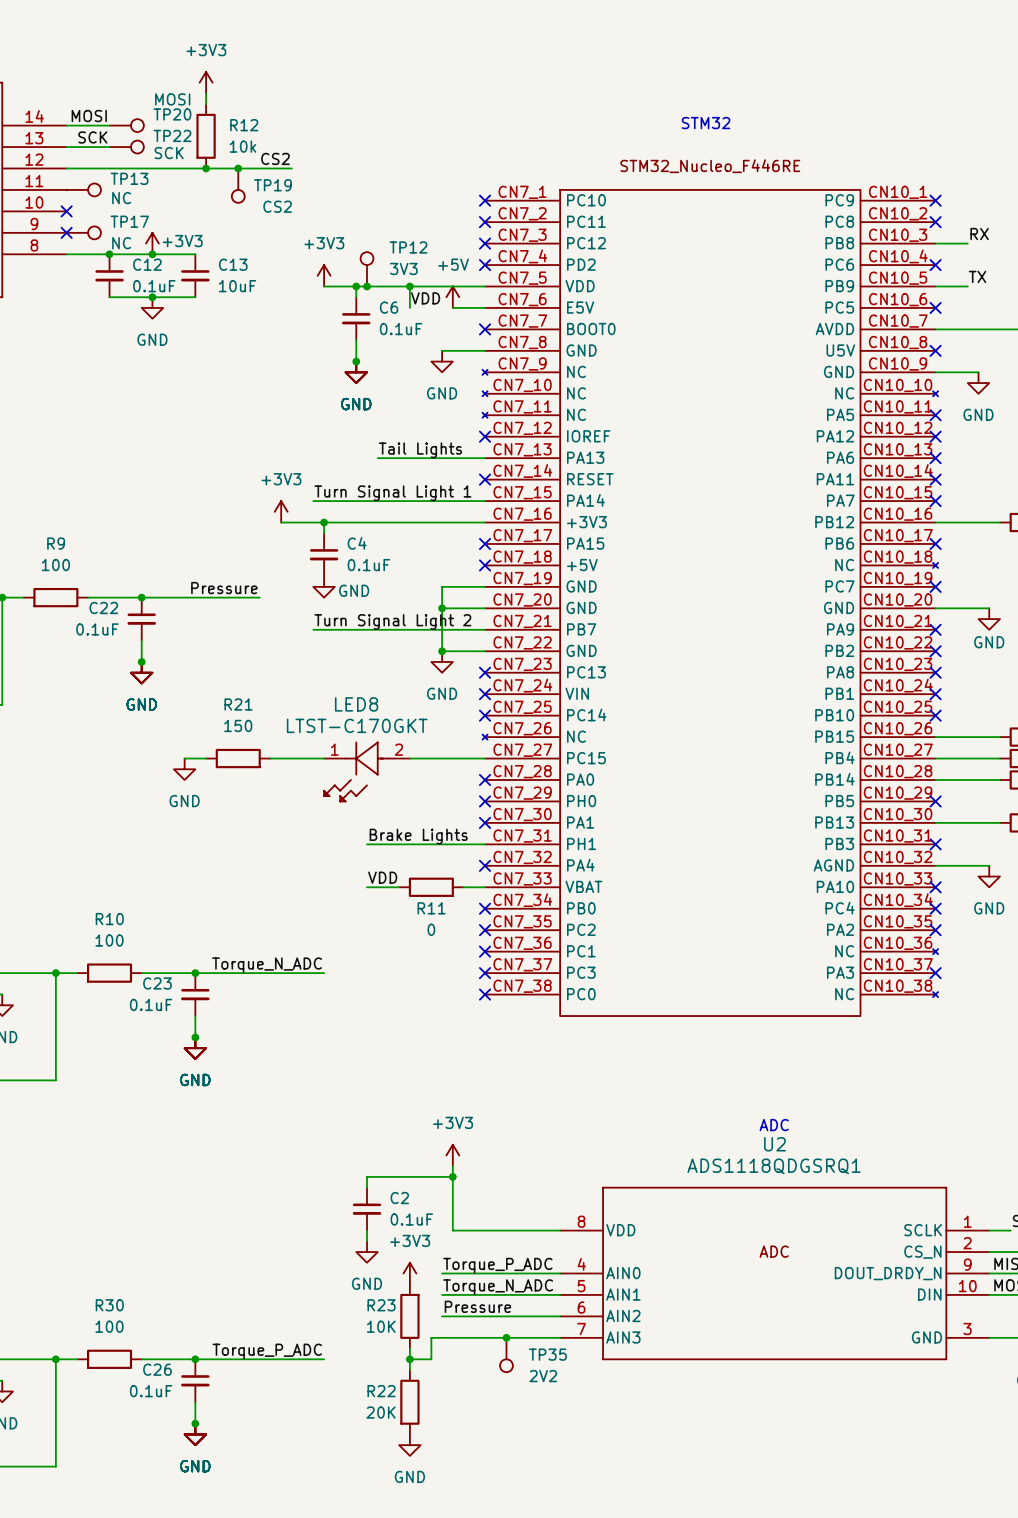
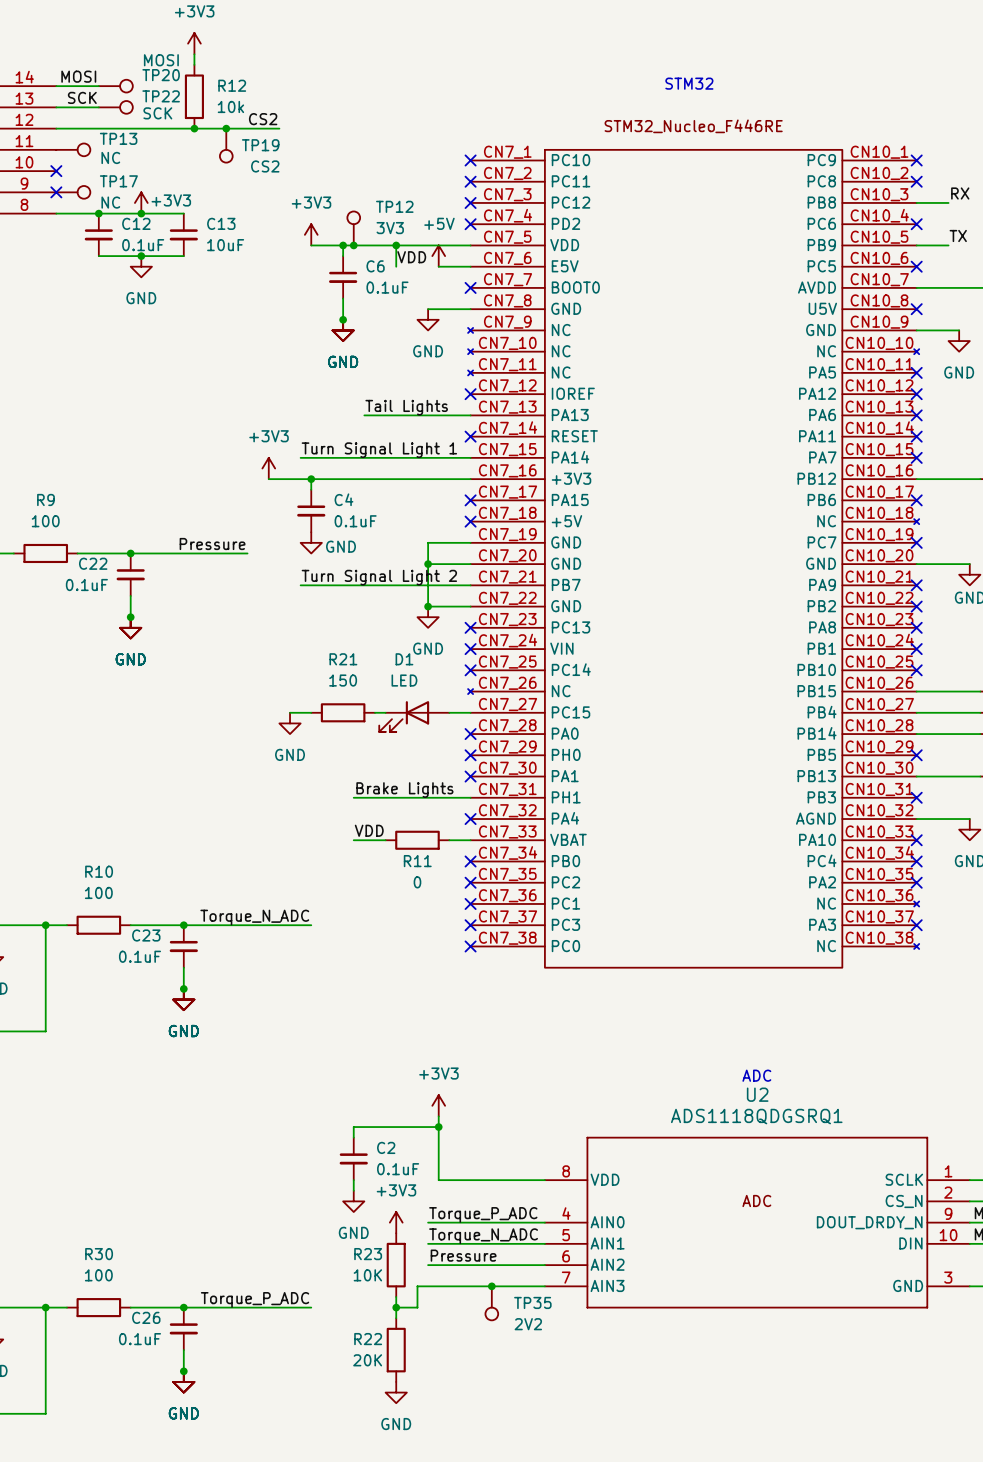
wire: (184, 758) (206, 758) -> none
R21 position: (238, 758) -> (343, 712)
wire: (270, 758) (302, 758) -> none
D1: none -> LED (414, 716)
power symbol position: GND (184, 769) -> GND (290, 723)
LED8: LTST-C170GKT (366, 771) -> none

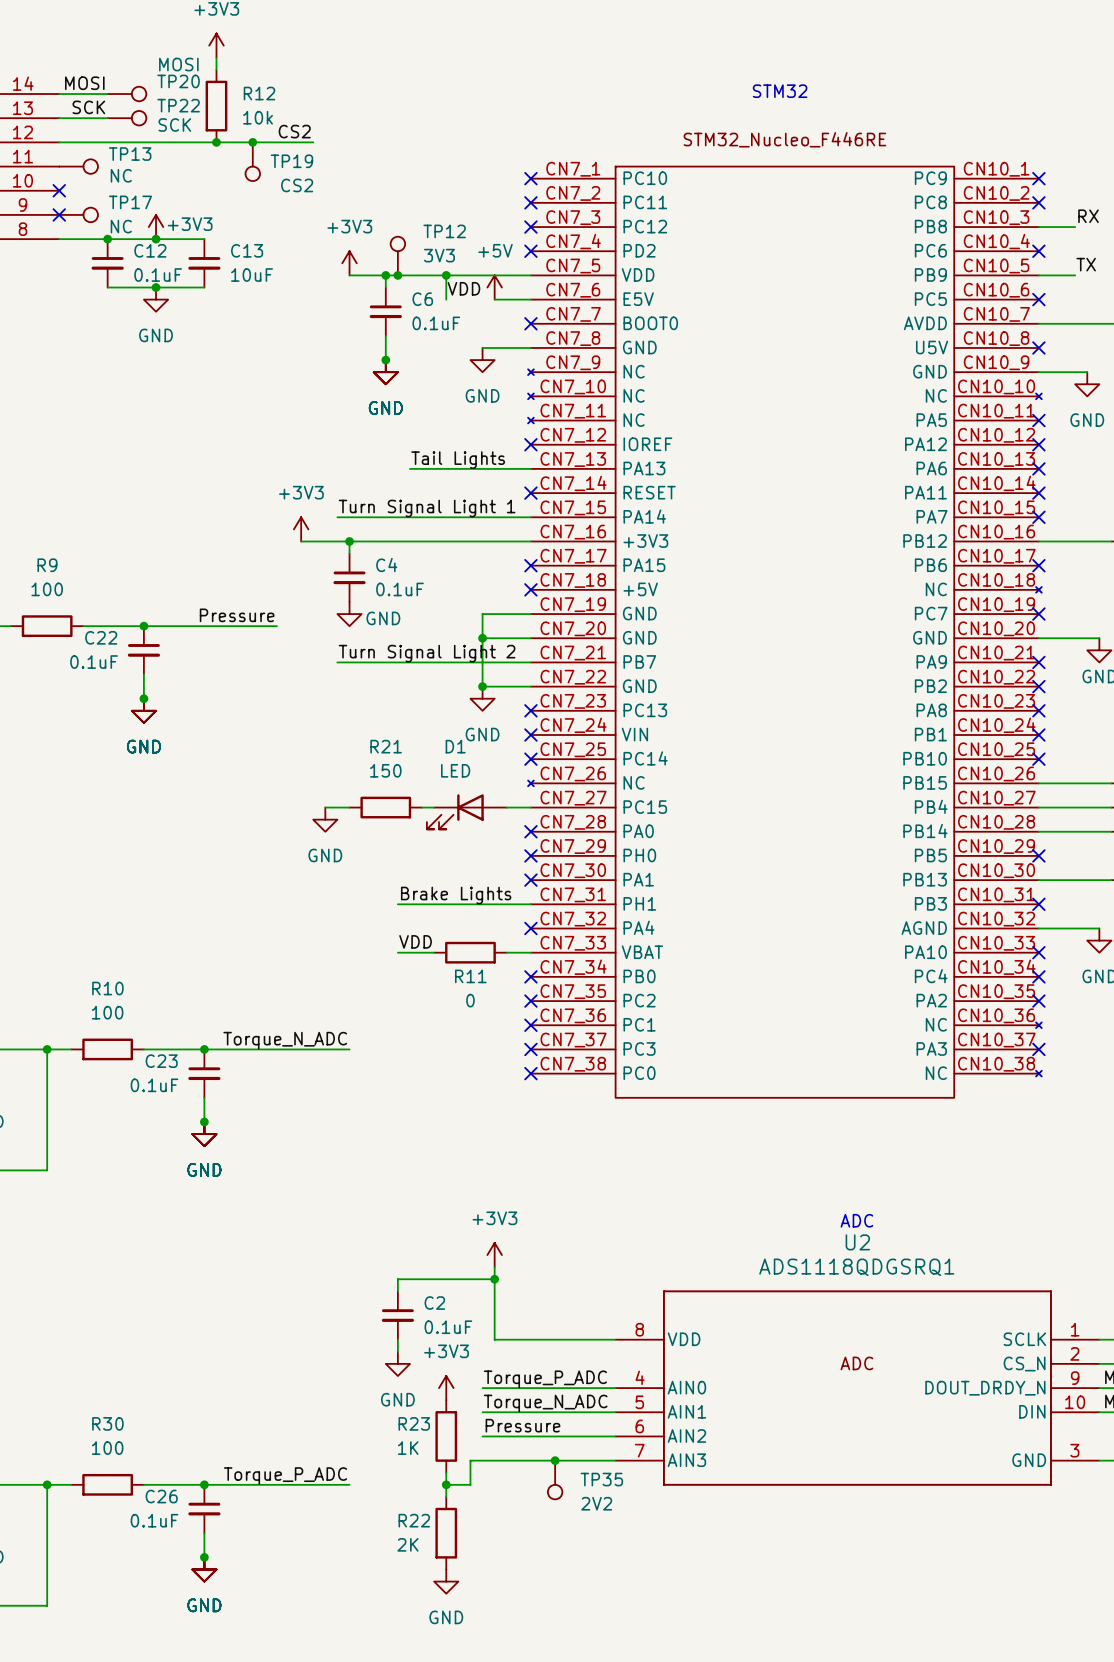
R23 value: 10K (367, 1275) -> 1K (408, 1448)
R22 value: 20K (367, 1360) -> 2K (407, 1544)

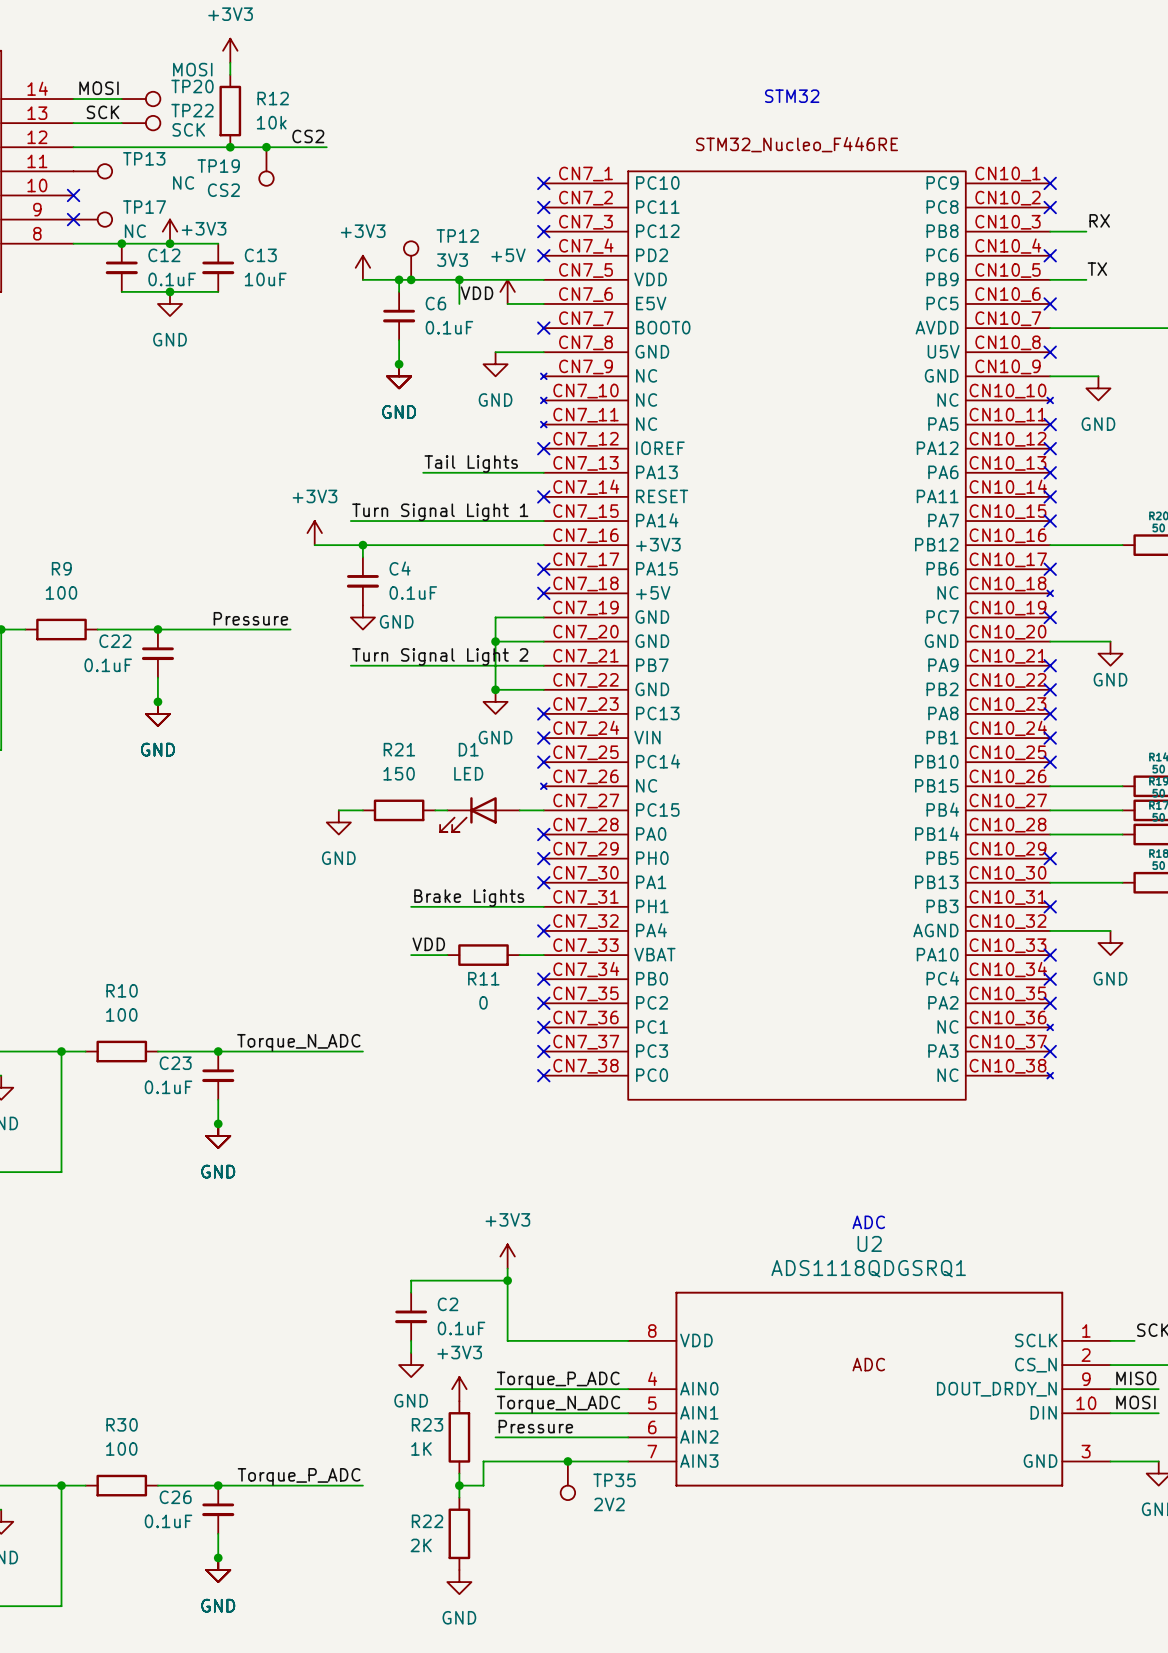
TP19 name position: TP19 (291, 161) -> TP19 (218, 166)
TP13 value position: NC (121, 175) -> NC (183, 182)
TP19 value position: CS2 (297, 185) -> CS2 (223, 190)

